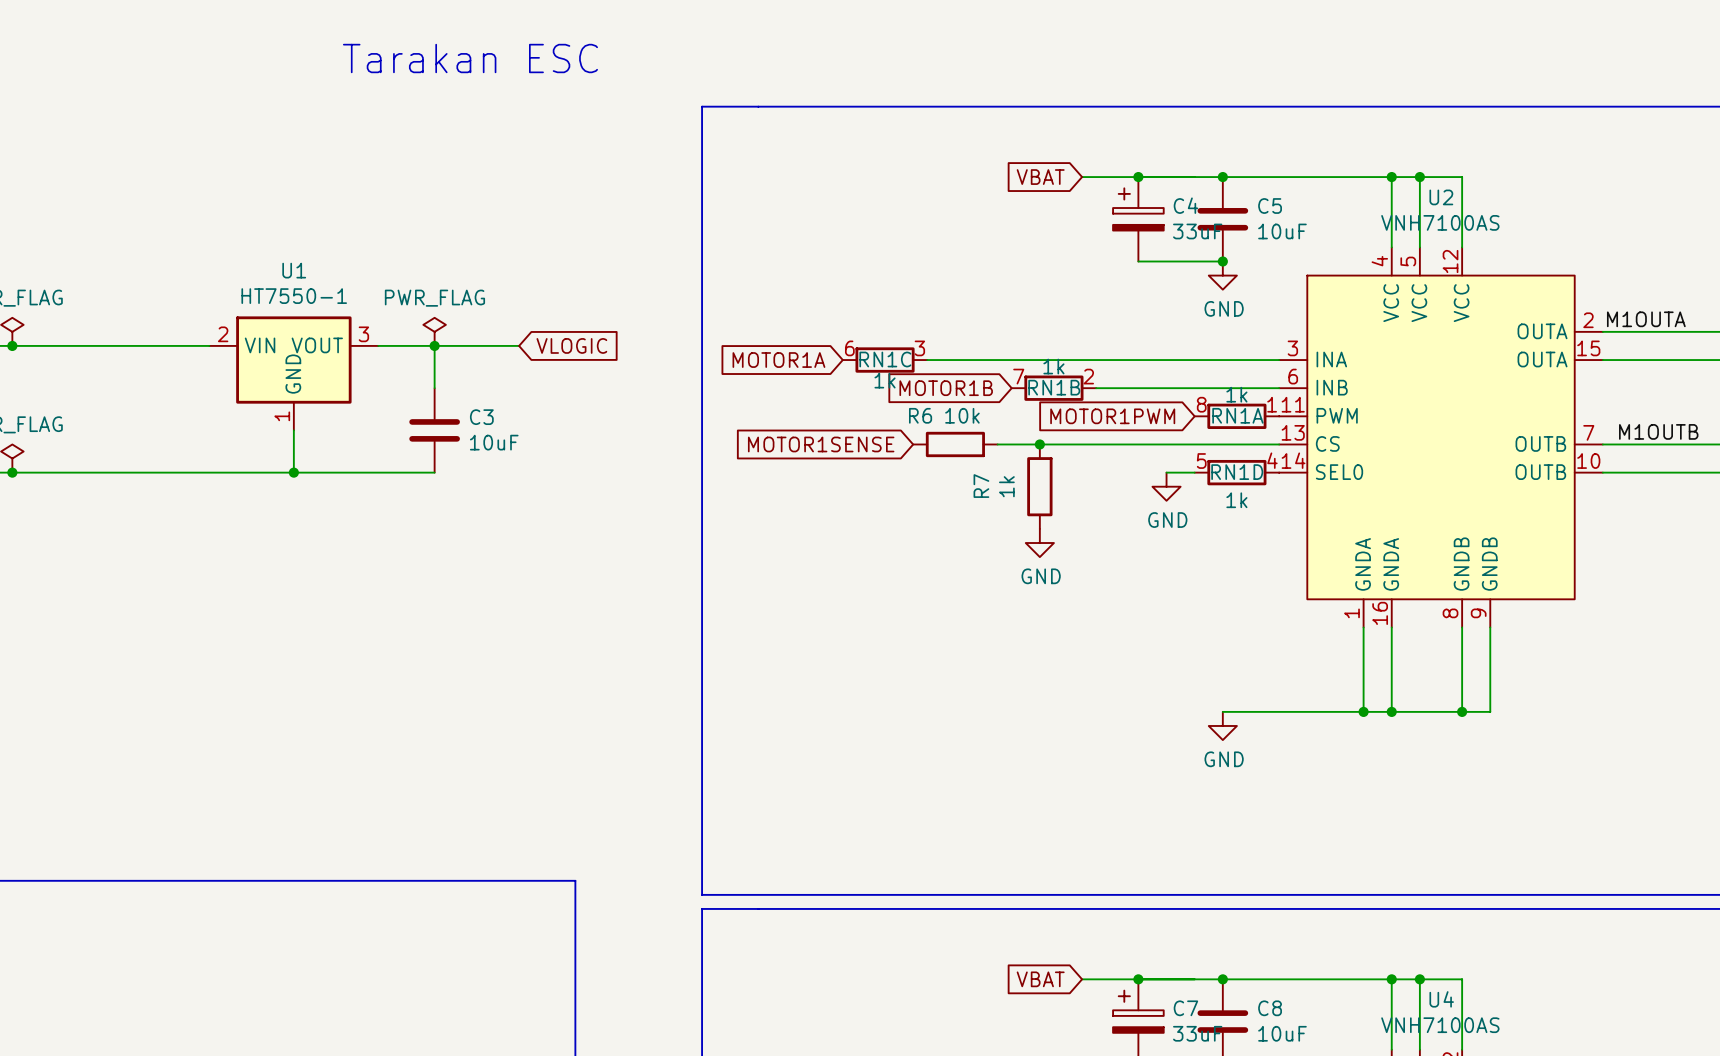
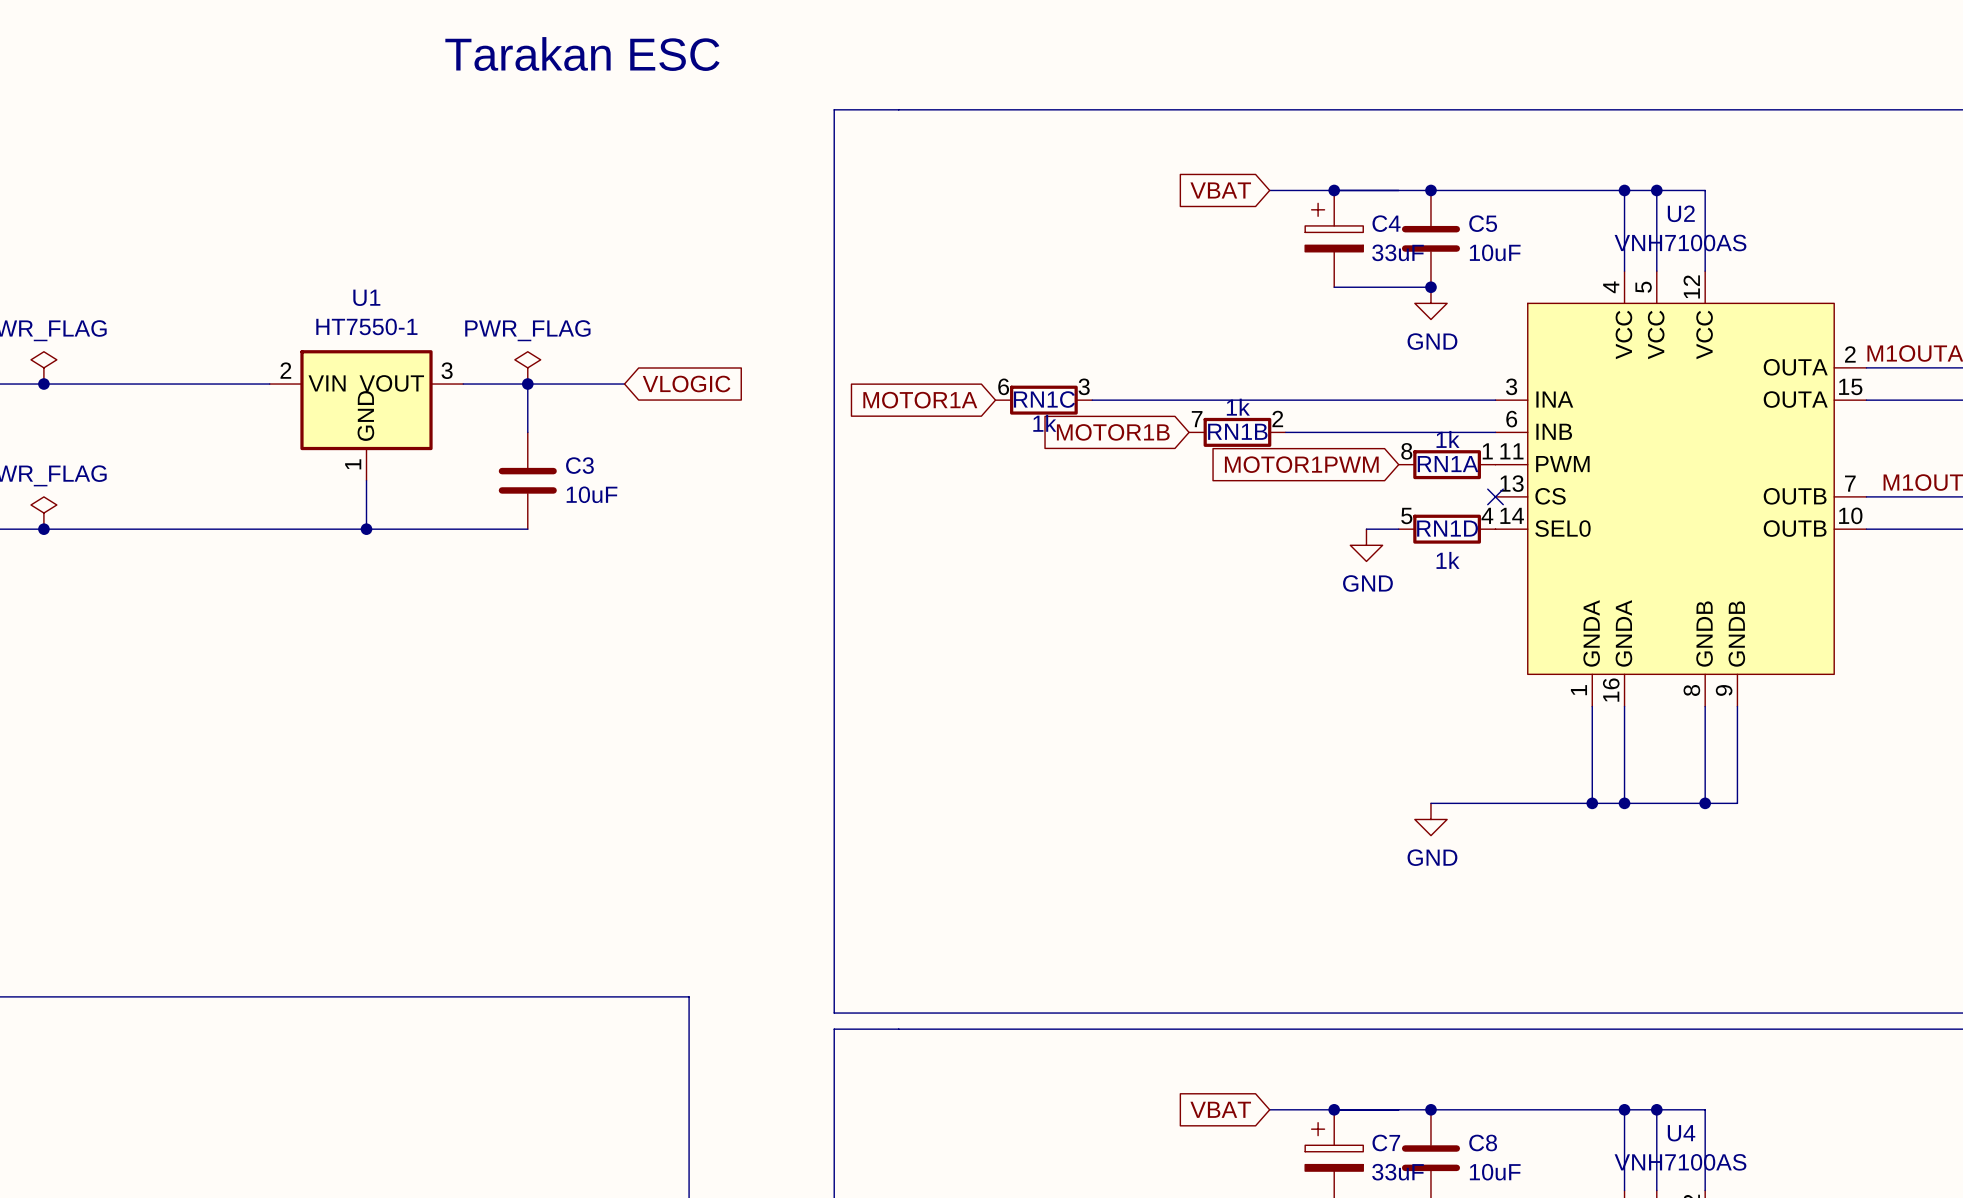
global label: MOTOR1SENSE (821, 444) -> none
R6: 10k (955, 444) -> none
wire: (997, 444) (1279, 444) -> none
junction: (1039, 444) -> none
no-connect mark: none -> (1495, 496)
R7: 1k (1039, 486) -> none
power symbol: GND (1039, 543) -> none

